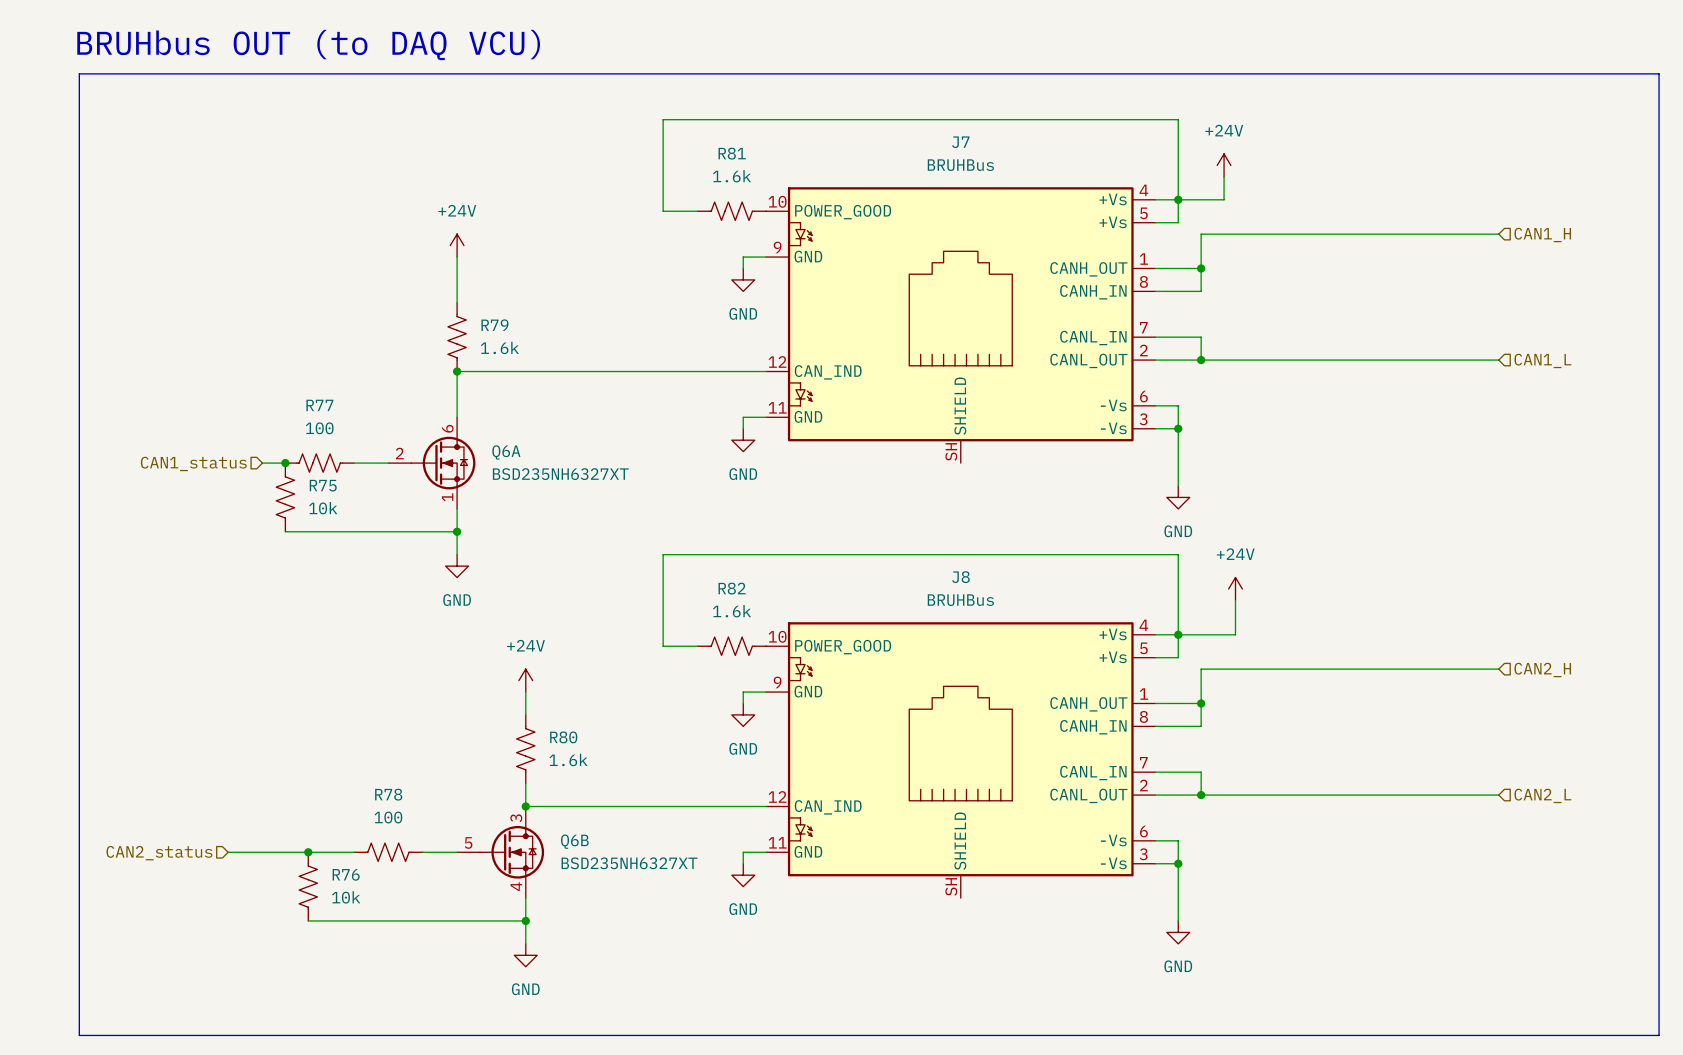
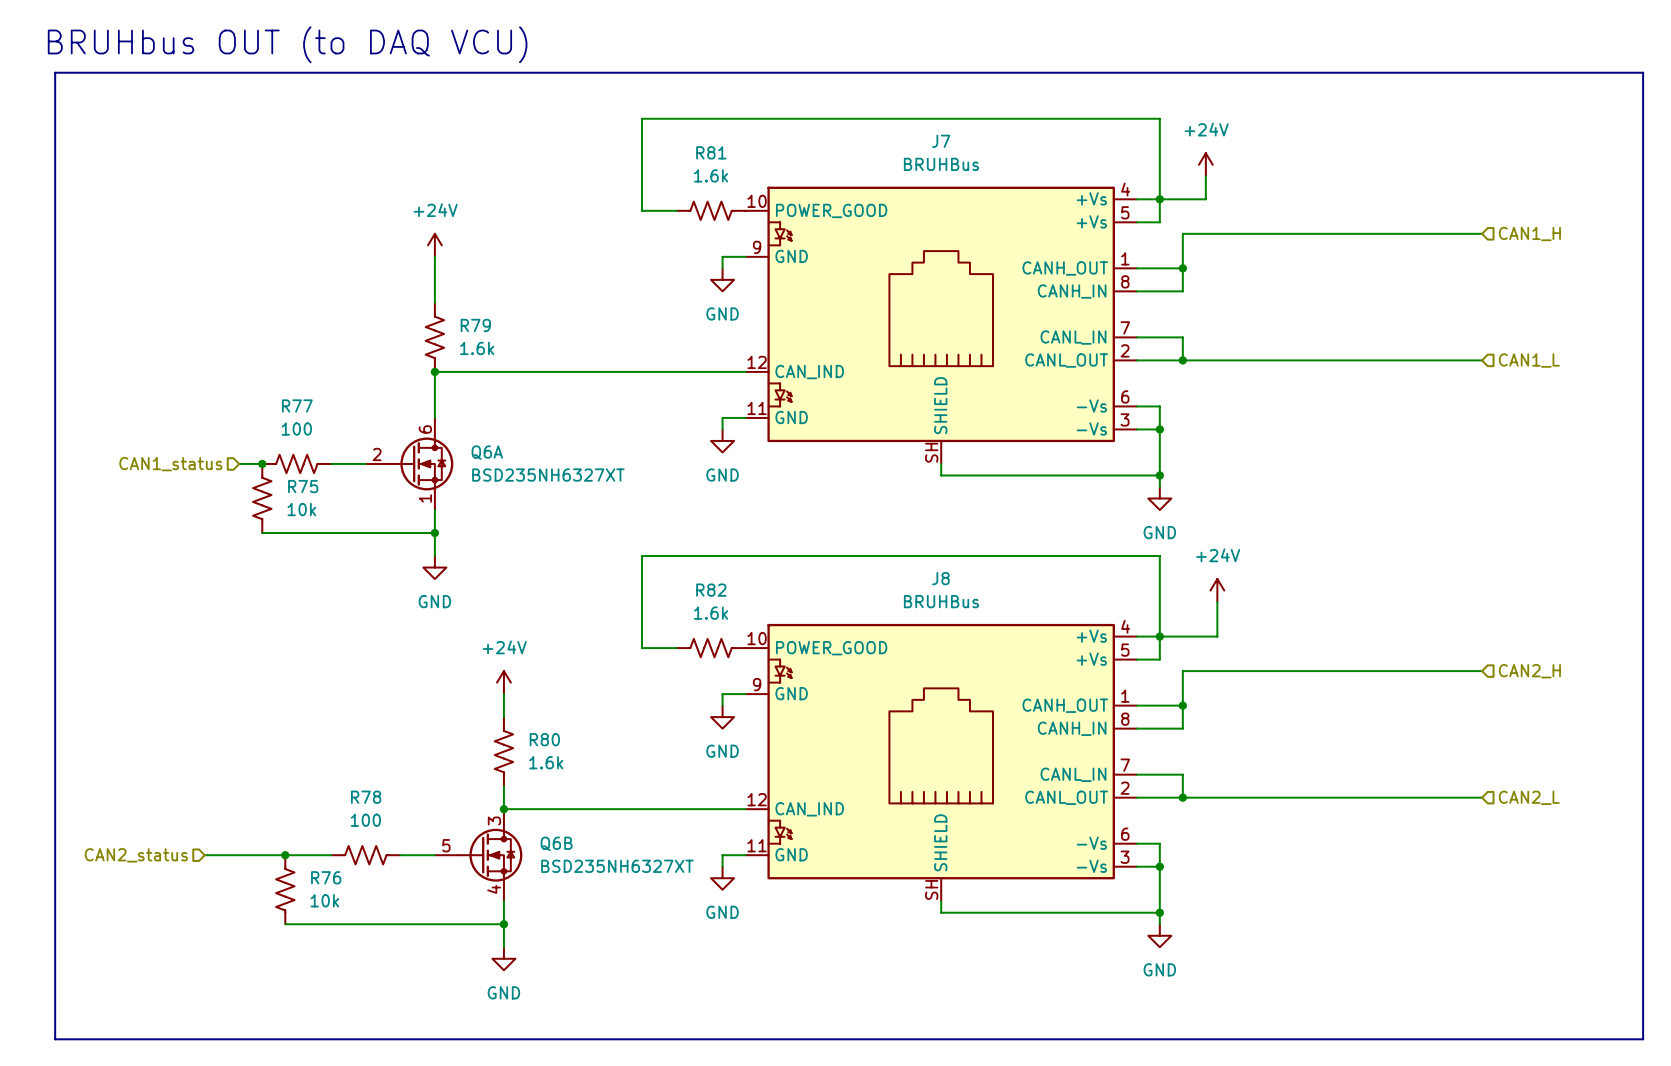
wire: none -> (941, 463) (941, 475) (1159, 475)
junction: none -> (1159, 475)
wire: none -> (941, 901) (941, 912) (1159, 912)
junction: none -> (1159, 912)

